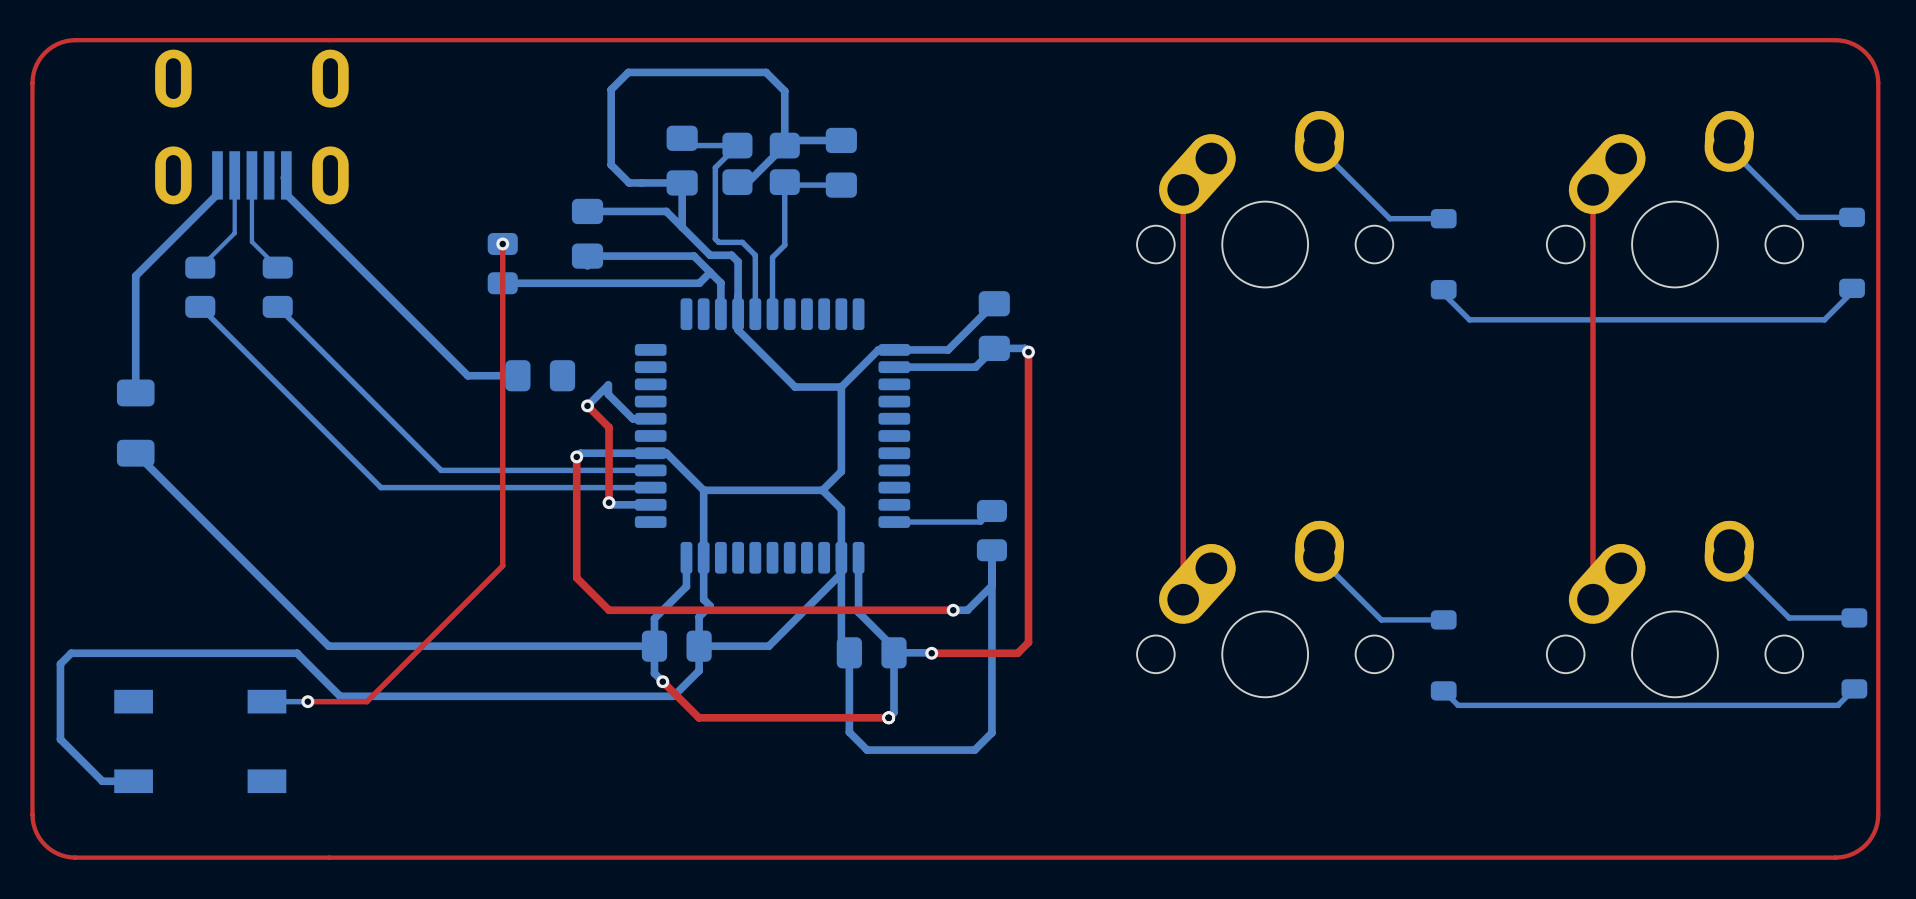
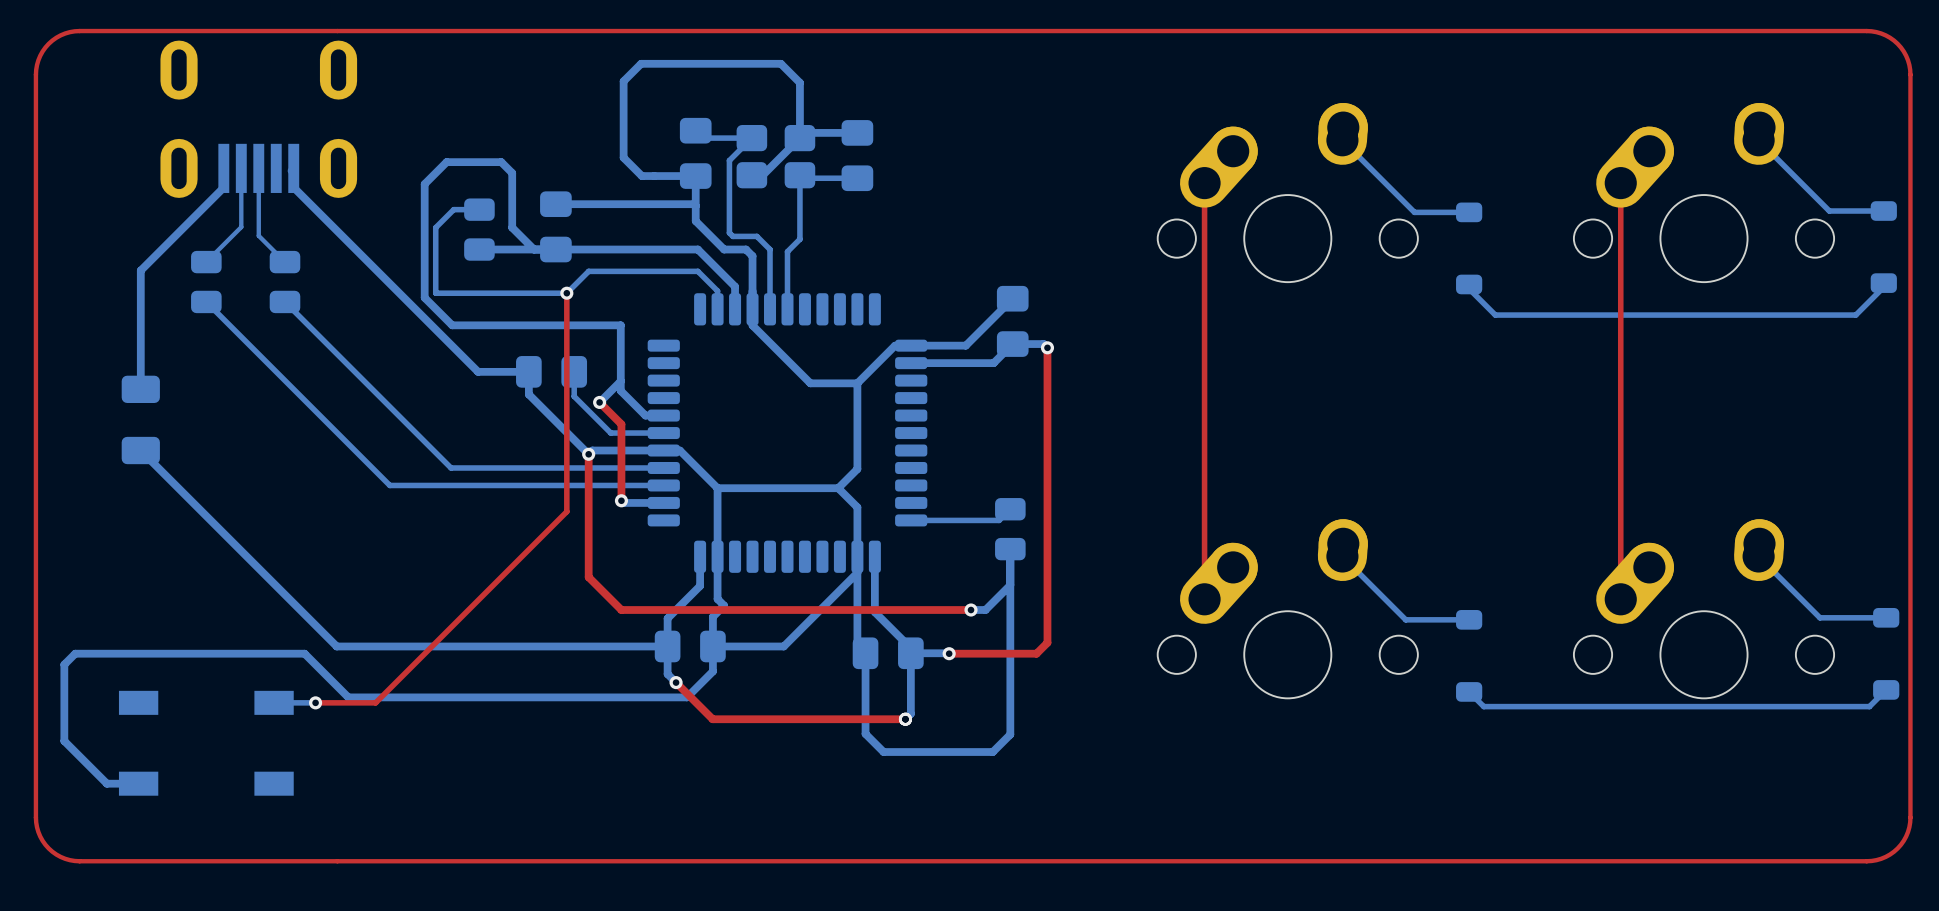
bottom track: none -> (555, 204) (694, 204) (695, 205)
bottom track: (587, 211) (666, 211) (682, 227) -> none
bottom track: none -> (479, 209) (453, 209) (435, 227) (435, 293) (566, 293) (588, 271) (697, 271) (717, 291) (717, 309)
part position: (587, 233) -> (555, 226)
top track: (502, 243) (502, 565) -> (566, 293) (566, 511) (513, 565)
via position: (502, 243) -> (566, 293)
bottom track: none -> (534, 249) (512, 227) (512, 173) (501, 162) (446, 162) (424, 184) (424, 297) (452, 325) (620, 325) (620, 381)
part position: (502, 263) -> (479, 229)
bottom track: (587, 265) (587, 256) (694, 256) (720, 282) (720, 291) -> (479, 249) (697, 249) (735, 286)
bottom track: (710, 272) (699, 283) (502, 283) -> none
bottom track: none -> (528, 371) (528, 394) (588, 454)
bottom track: none -> (574, 371) (574, 396) (610, 433) (663, 433)

